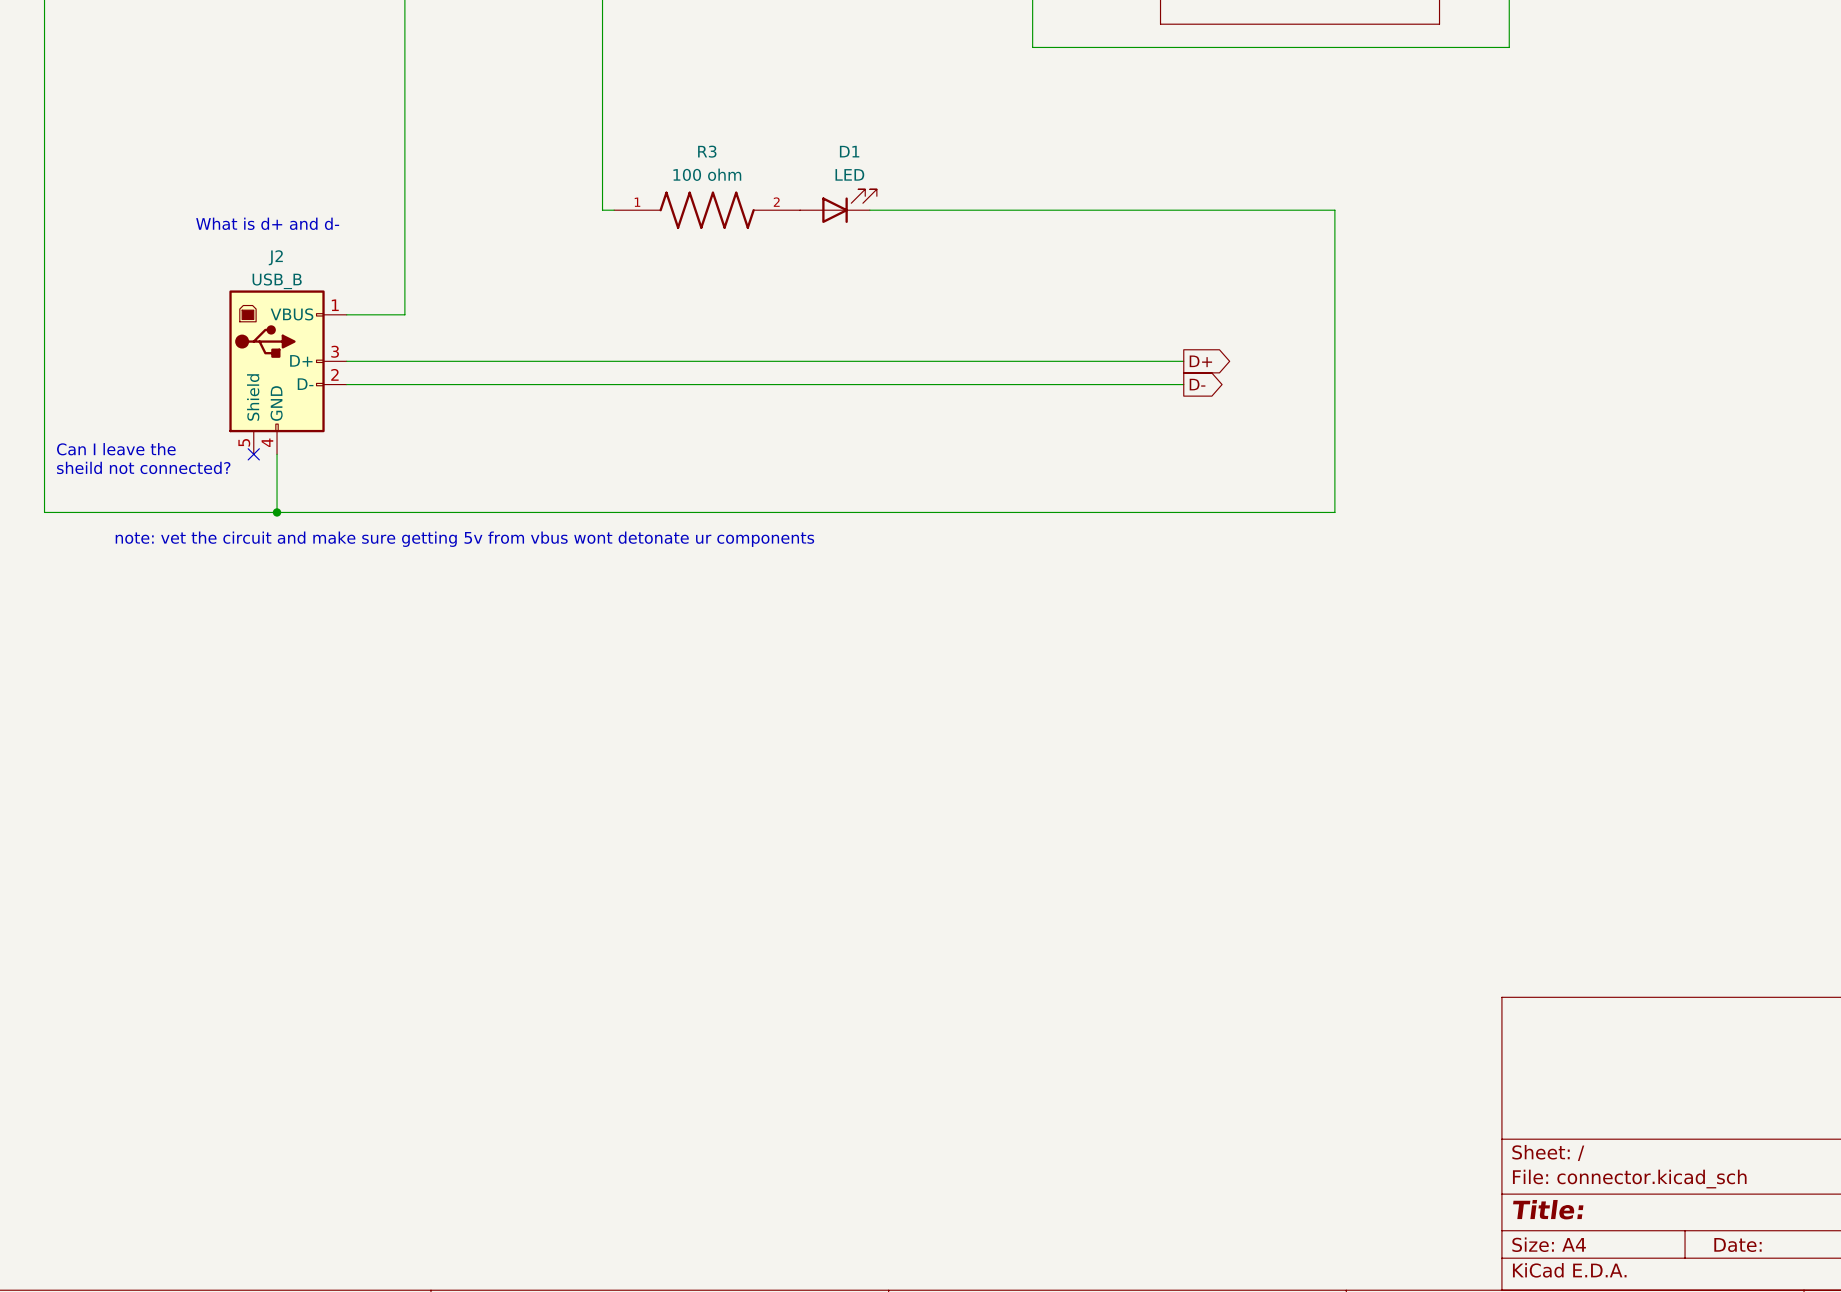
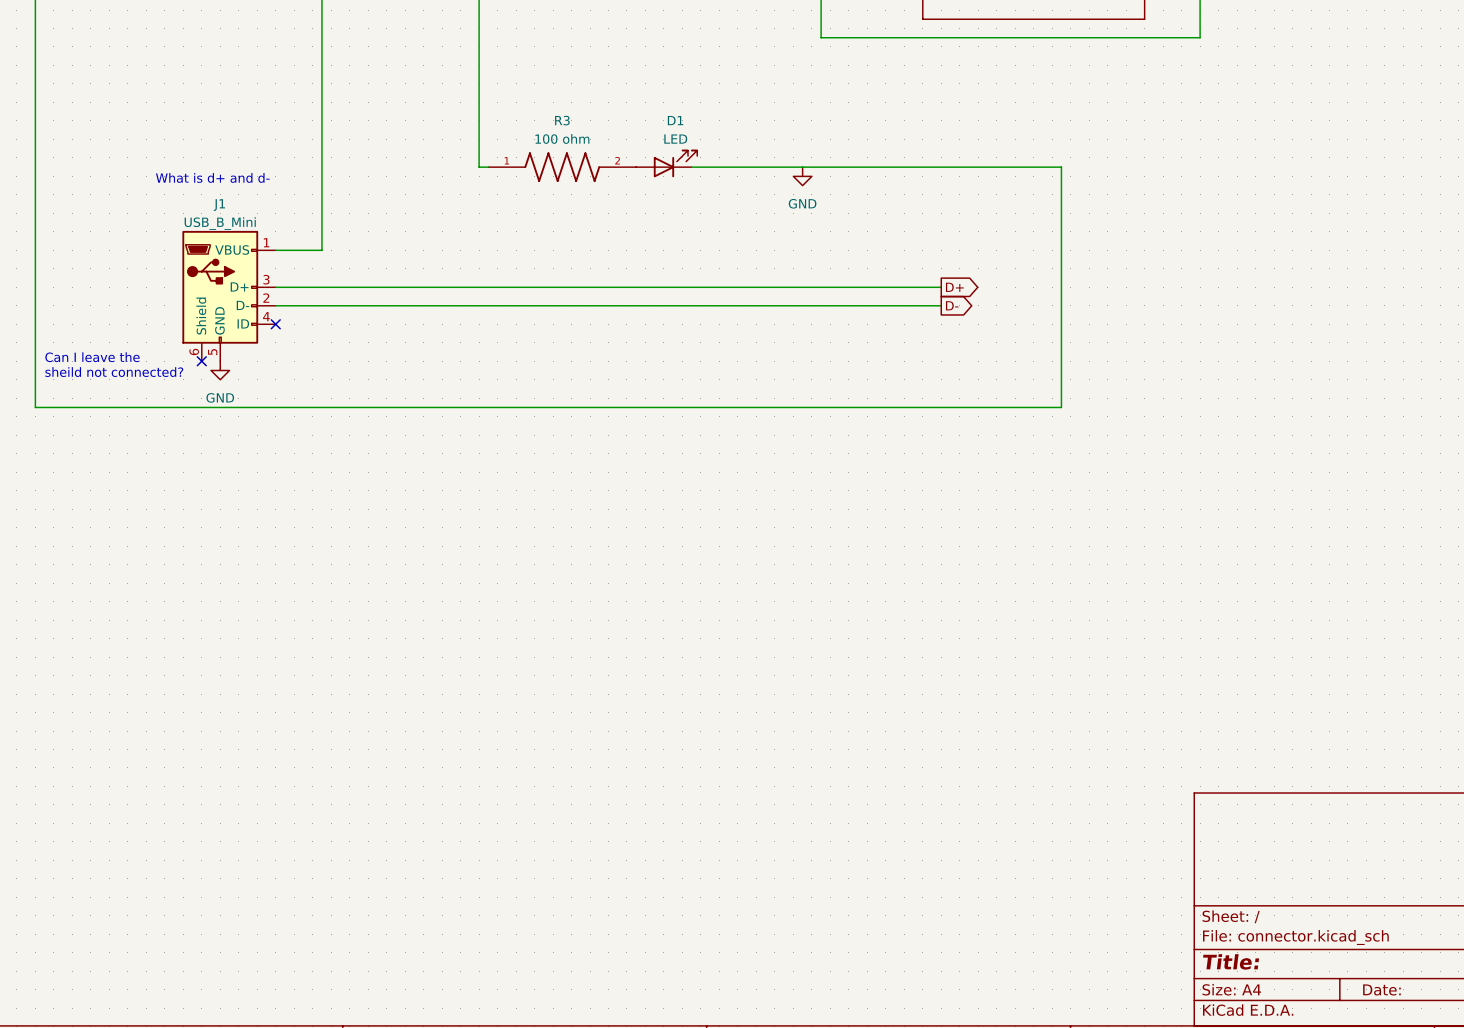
power symbol: none -> GND (802, 176)
J2: USB_B (288, 372) -> none
J1: none -> USB_B_Mini (229, 296)
no-connect mark: none -> (275, 324)
wire: (277, 454) (277, 512) -> none
power symbol: none -> GND (220, 370)
junction: (277, 512) -> none
text: note: vet the circuit and make sure getting 5v from vbus wont detonate ur components (464, 539) -> none

